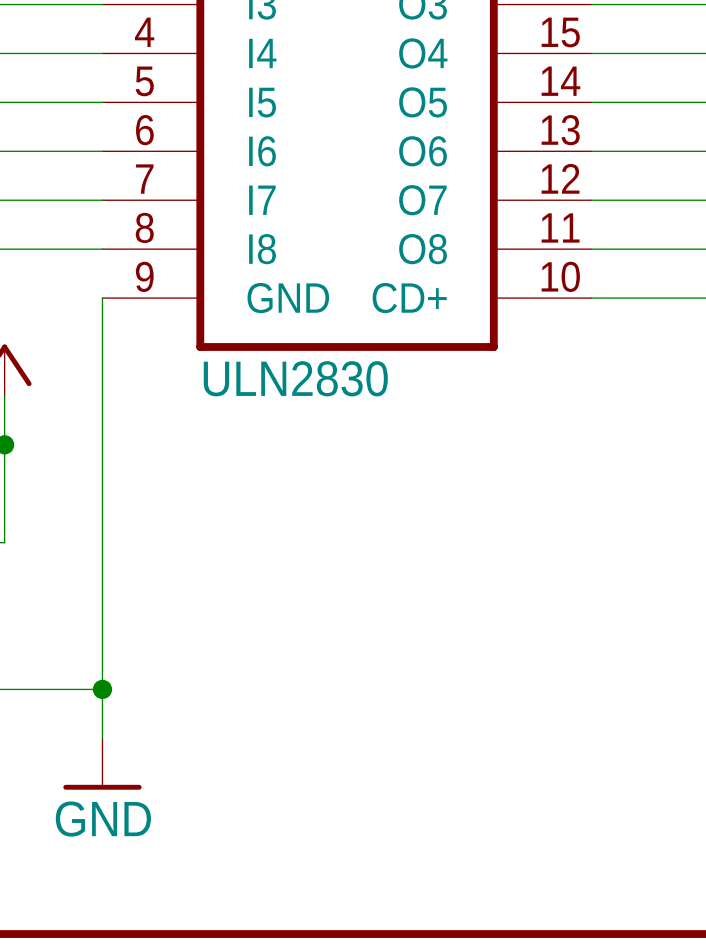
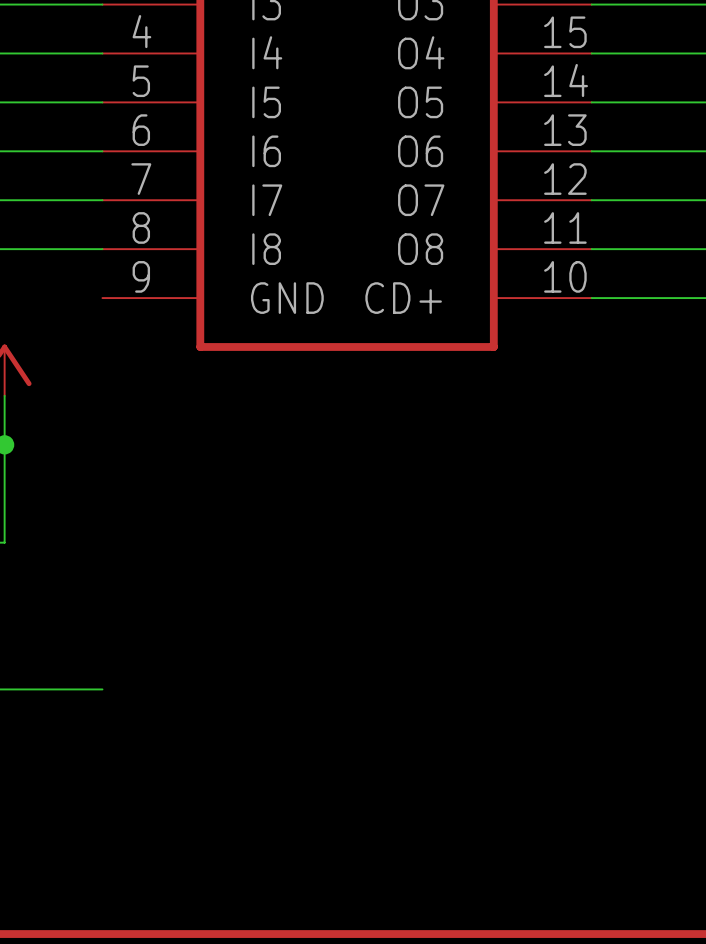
wire: (102, 298) (102, 738) -> none
part value: ULN2830 (295, 378) -> none
junction: (102, 689) -> none
power symbol: GND (102, 764) -> none

